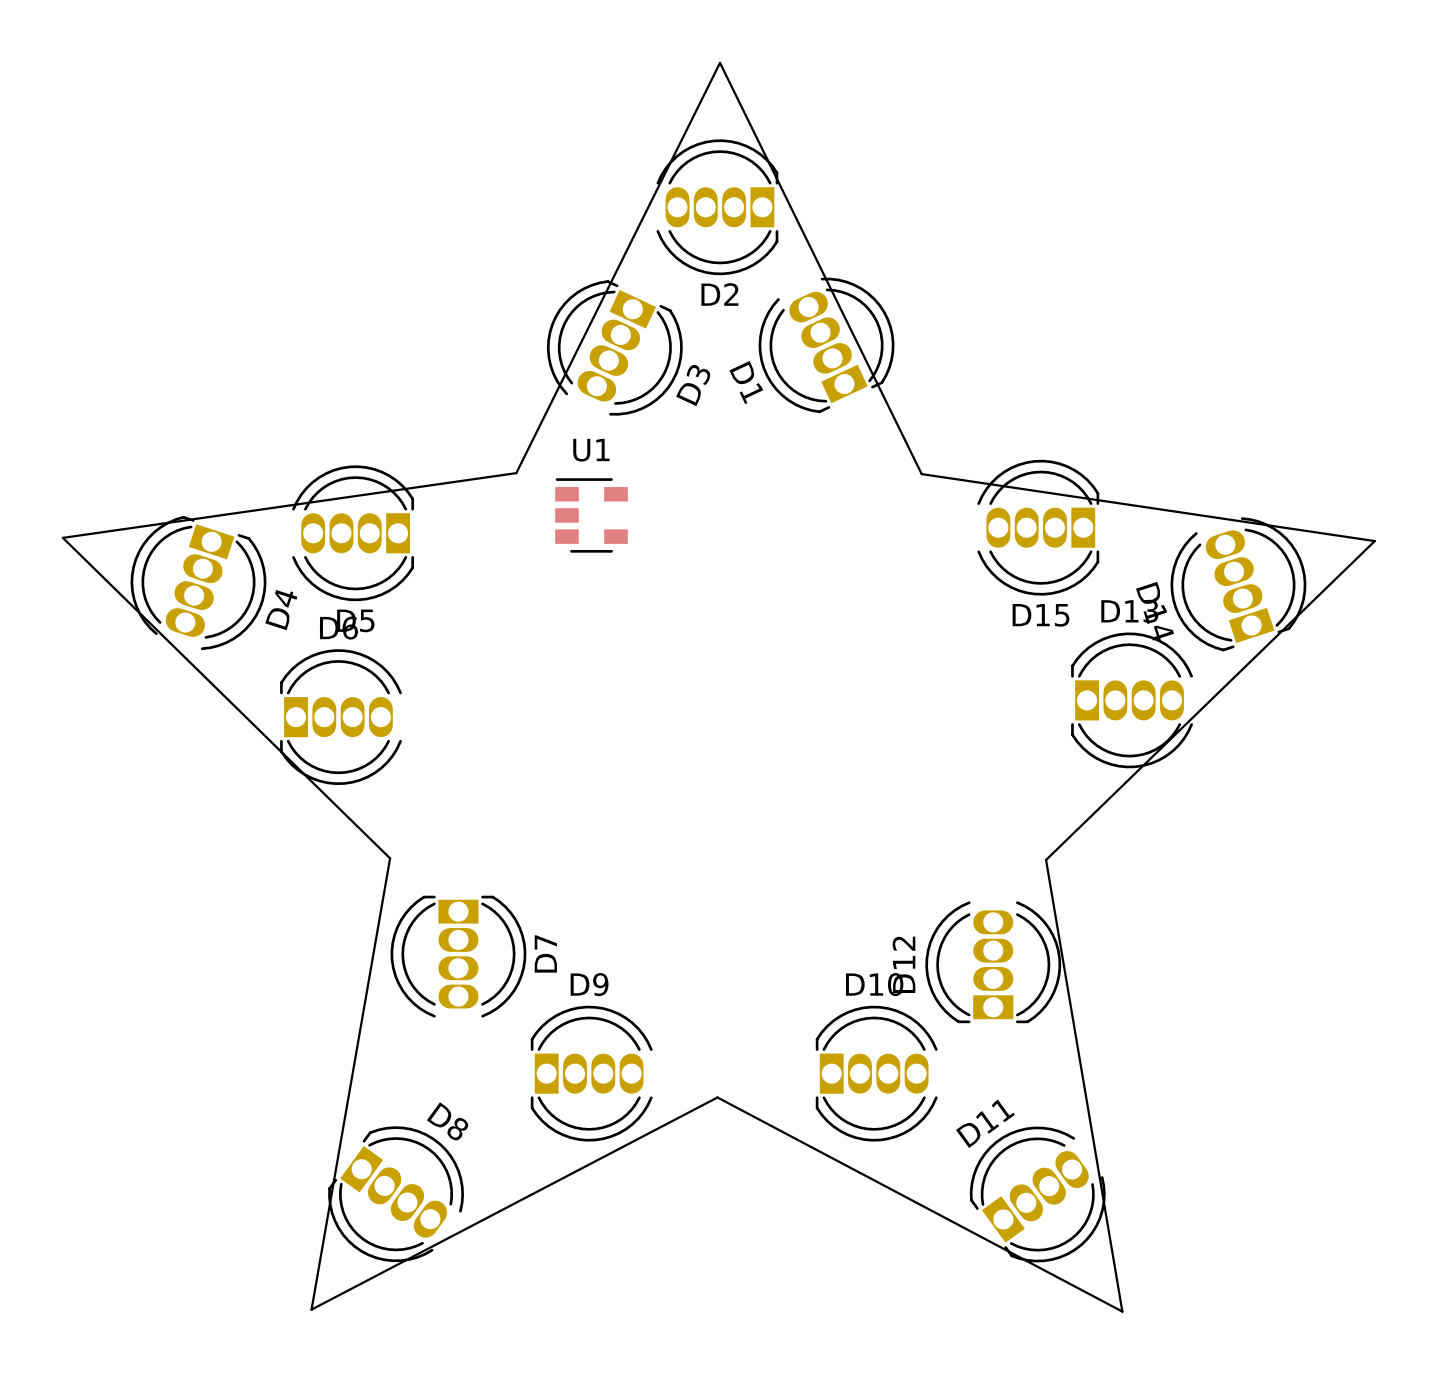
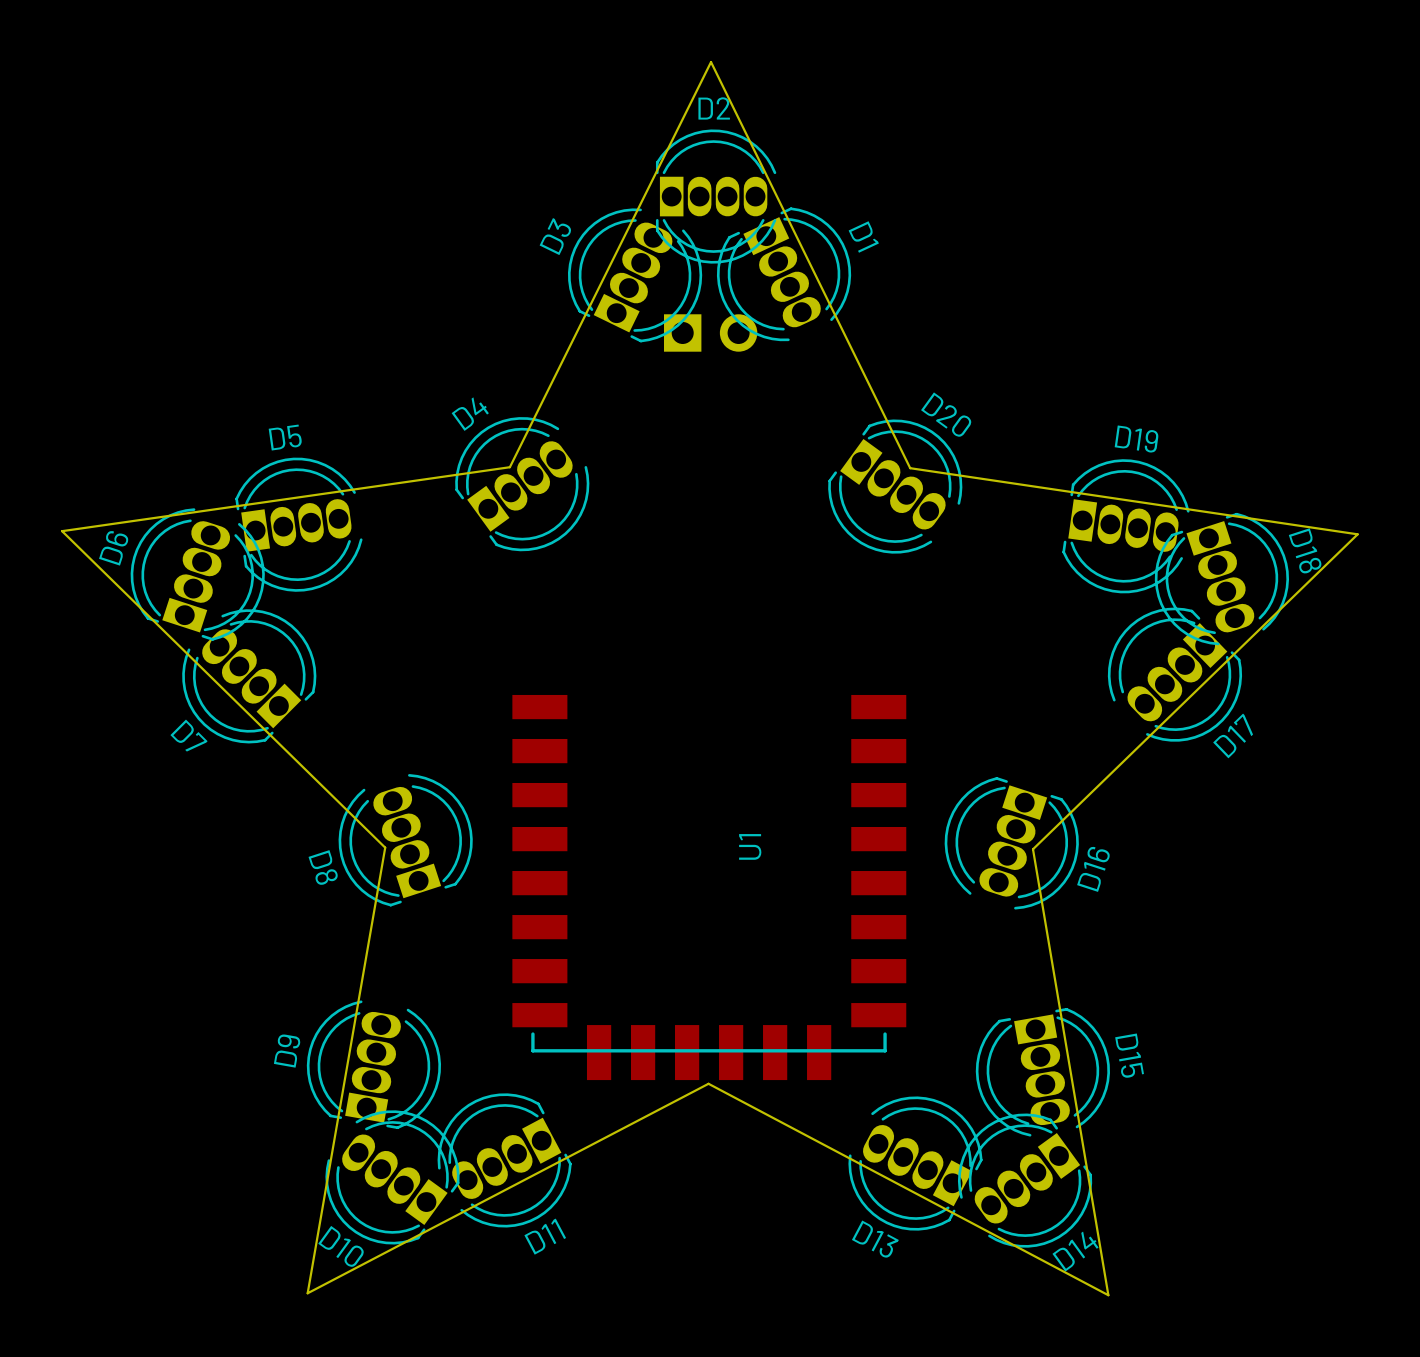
D2 rotation: 0° (717, 207) -> 180° (716, 196)
D3 footprint: [546, 280, 683, 416] -> [568, 208, 703, 343]
part: none -> (710, 332)
D1 rotation: 0° (826, 345) -> 180° (784, 274)
D3 name position: D3 (693, 385) -> D3 (555, 236)
U1 name position: U1 (591, 450) -> U1 (750, 846)
U1 footprint: [555, 478, 628, 553] -> [512, 694, 907, 1081]
D20: none -> (895, 486)
D15 rotation: 0° (1038, 527) -> 100° counterclockwise (1042, 1072)
D15 position: (1038, 527) -> (1042, 1072)
D19: none -> (1125, 526)
D5 rotation: 0° (353, 533) -> 172° clockwise (298, 524)
D4 rotation: 0° (198, 582) -> 144° counterclockwise (522, 484)
D4 position: (198, 582) -> (522, 484)
D14 rotation: 0° (1238, 584) -> 108° counterclockwise (1025, 1180)
D14 position: (1238, 584) -> (1025, 1180)
D18: none -> (1221, 579)
D17: none -> (1174, 674)
D13 rotation: 0° (1132, 700) -> 152° counterclockwise (915, 1163)
D13 position: (1132, 700) -> (915, 1163)
D6 rotation: 0° (341, 717) -> 72° counterclockwise (197, 574)
D6 position: (341, 717) -> (197, 574)
D16: none -> (1011, 843)
D7 rotation: 0° (458, 956) -> 135° clockwise (249, 676)
D7 position: (458, 956) -> (249, 676)
D12: (993, 962) -> none
D9 rotation: 0° (591, 1073) -> 80° counterclockwise (373, 1064)
D9 position: (591, 1073) -> (373, 1064)
D10 rotation: 0° (876, 1073) -> 144° counterclockwise (392, 1177)
D10 position: (876, 1073) -> (392, 1177)
D8 rotation: 0° (396, 1194) -> 144° counterclockwise (405, 840)
D8 position: (396, 1194) -> (405, 840)
D11 rotation: 0° (1037, 1194) -> 172° counterclockwise (504, 1160)
D11 position: (1037, 1194) -> (504, 1160)

